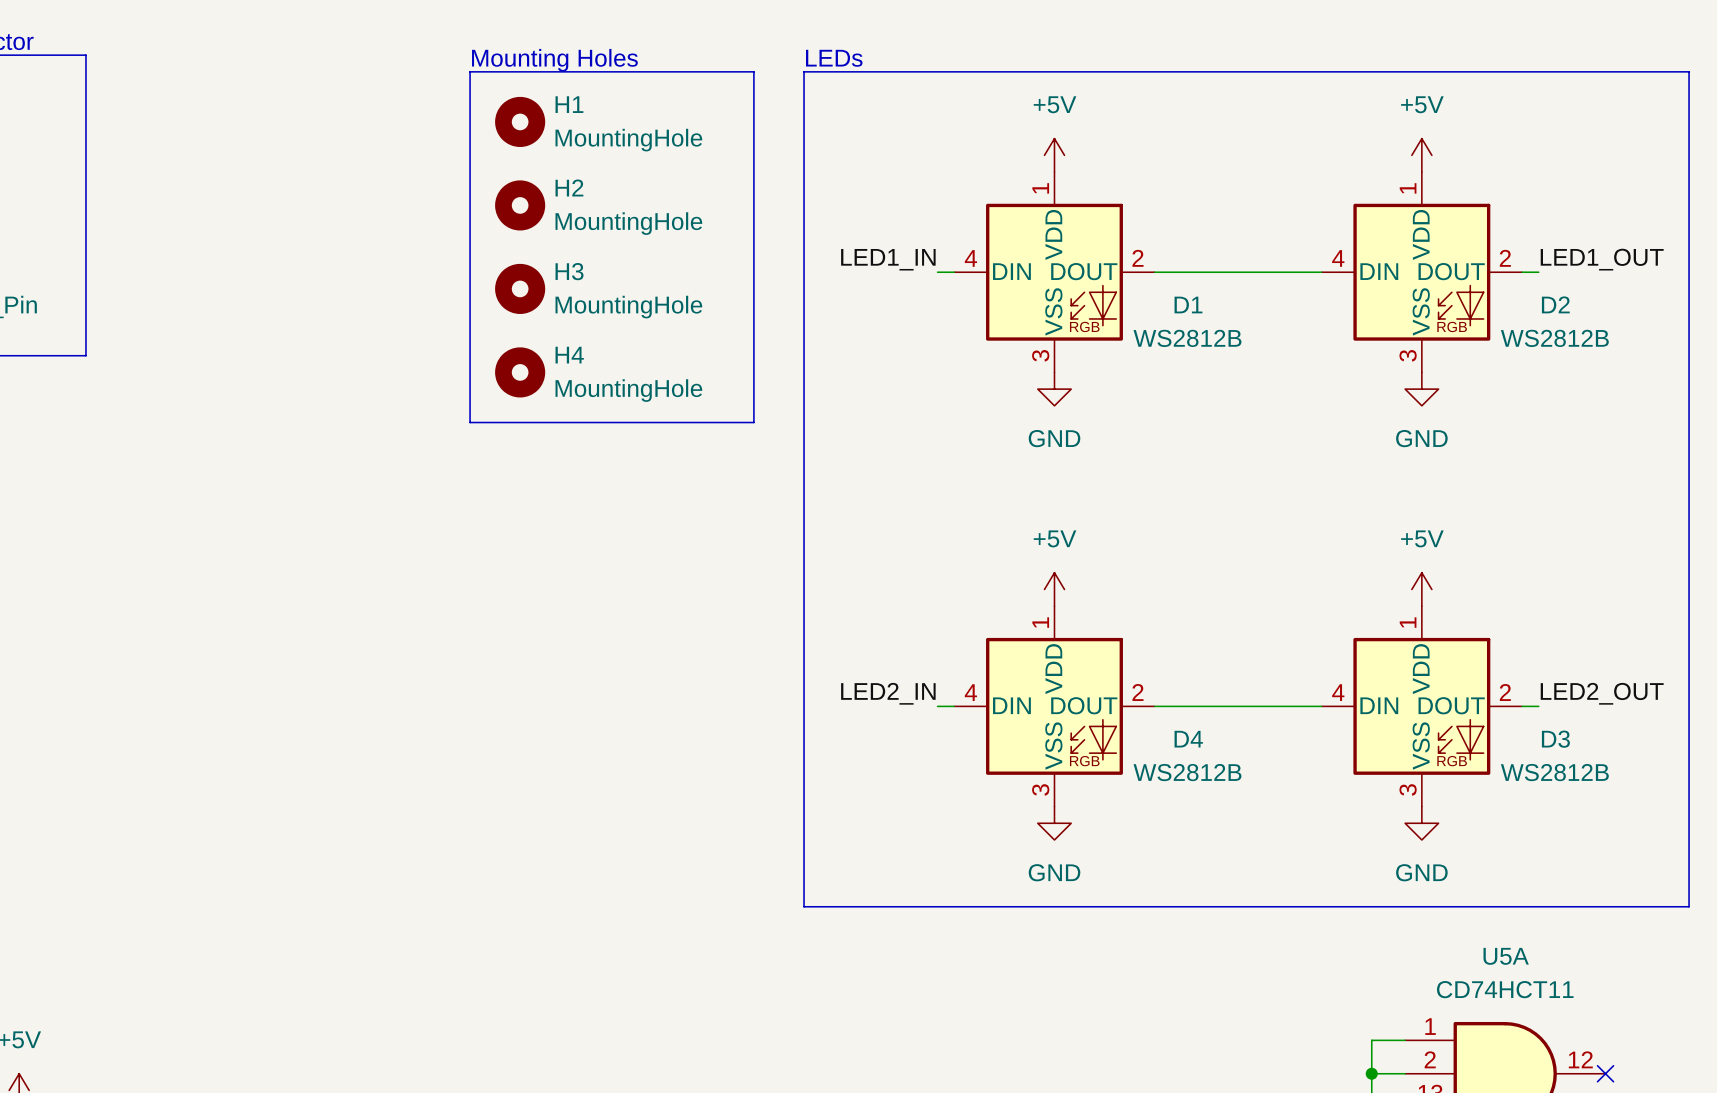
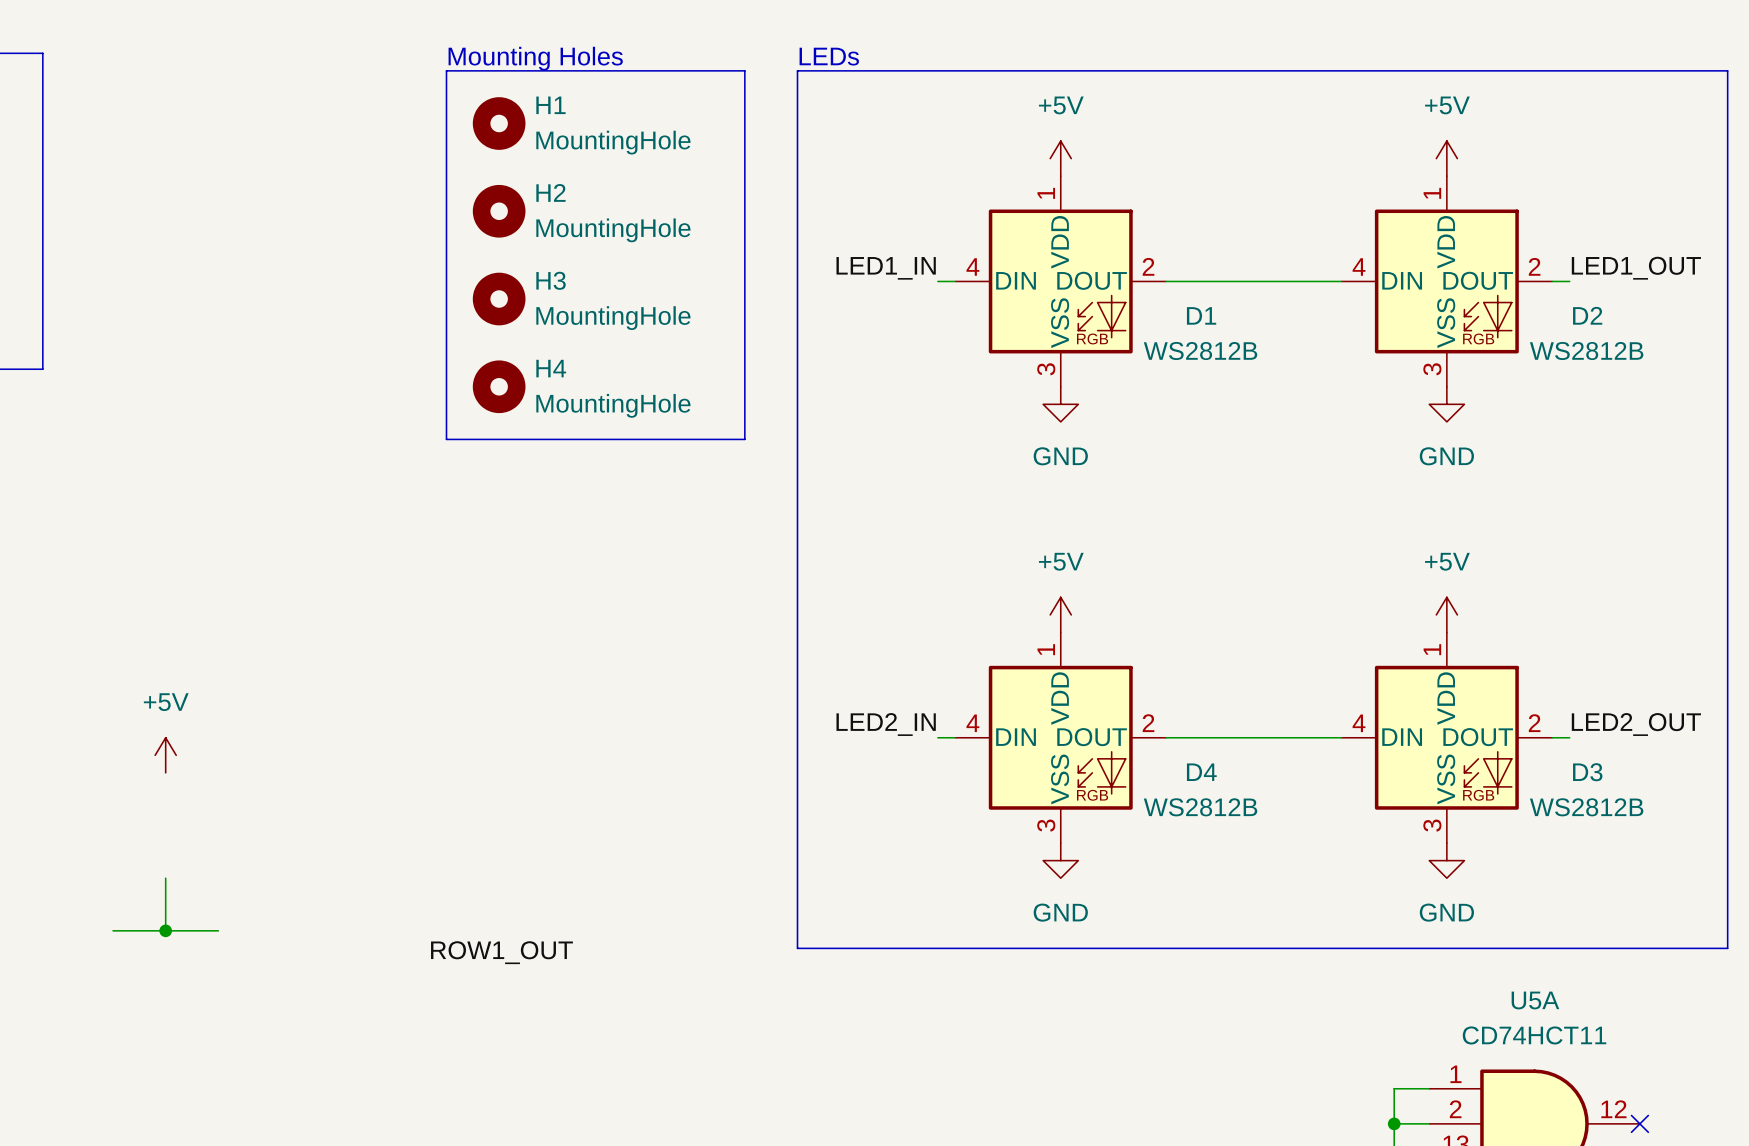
power symbol: none -> +5V (165, 755)
wire: none -> (165, 878) (165, 930)
wire: none -> (113, 930) (218, 930)
junction: none -> (165, 930)
label: none -> ROW1_OUT (501, 952)

